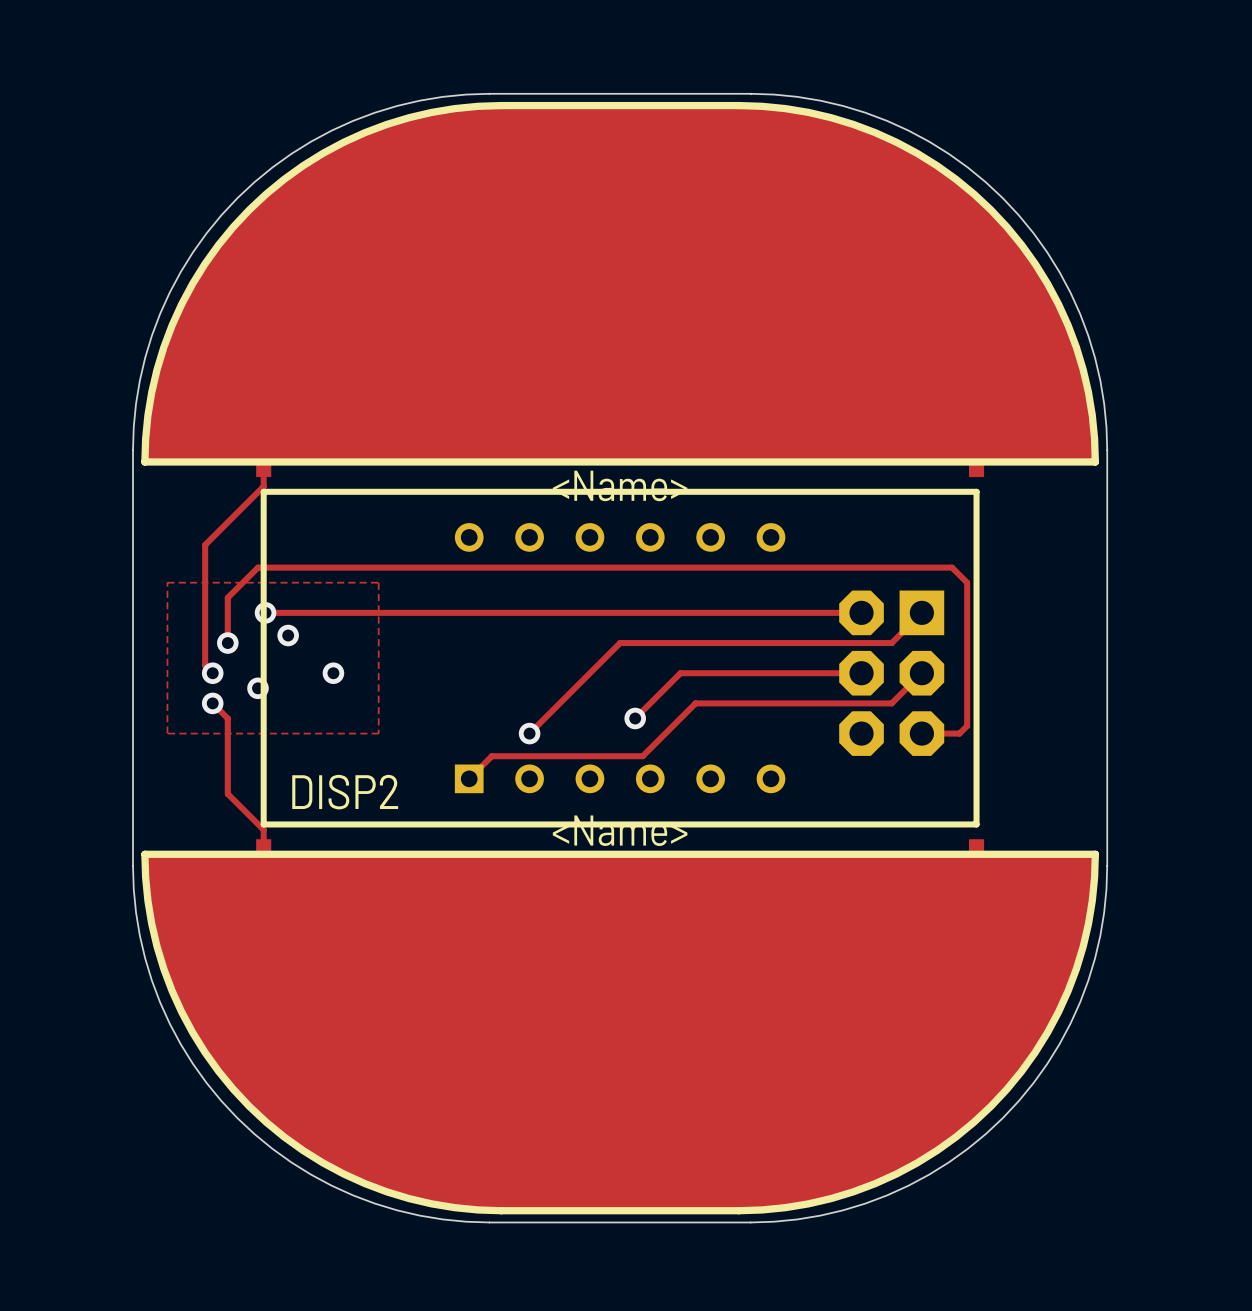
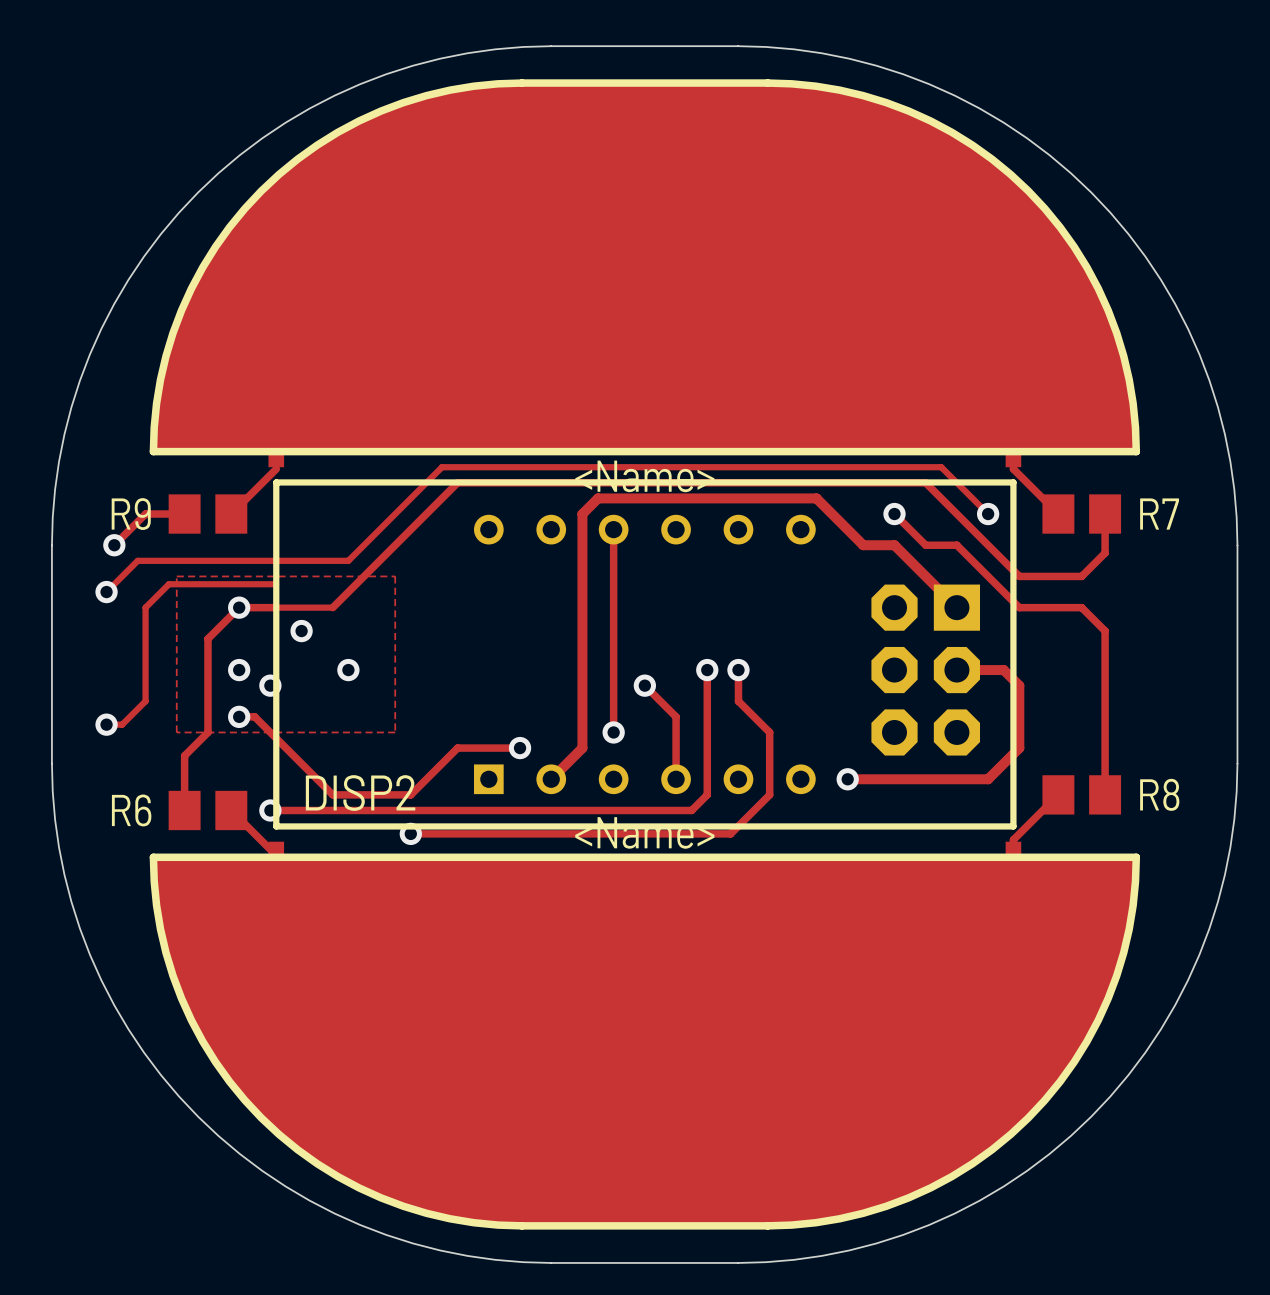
board edge: (489, 93) (774, 94) (820, 100) (865, 112) (887, 120) (929, 141) (948, 153) (985, 182) (1018, 215) (1047, 252) (1059, 272) (1080, 313) (1088, 335) (1100, 380) (1104, 403) (1107, 450) (1107, 866) (1104, 912) (1095, 958) (1080, 1002) (1059, 1044) (1047, 1064) (1018, 1101) (985, 1134) (948, 1162) (908, 1185) (865, 1203) (820, 1215) (797, 1219) (750, 1222) (466, 1221) (419, 1215) (374, 1203) (353, 1195) (311, 1174) (272, 1148) (237, 1118) (206, 1083) (180, 1044) (160, 1002) (151, 980) (139, 935) (133, 889) (133, 450) (136, 403) (139, 380) (151, 335) (160, 313) (180, 272) (193, 252) (221, 215) (254, 182) (291, 153) (331, 130) (374, 112) (419, 100) (442, 96) (489, 93) -> (551, 46) (523, 46) (467, 53) (413, 65) (360, 84) (309, 108) (262, 138) (218, 173) (198, 192) (178, 212) (144, 256) (114, 303) (89, 354) (71, 407) (59, 461) (52, 517) (52, 791) (59, 847) (71, 901) (89, 954) (114, 1005) (144, 1052) (178, 1096) (218, 1135) (262, 1170) (309, 1200) (360, 1224) (386, 1234) (440, 1250) (467, 1255) (523, 1262) (766, 1262) (821, 1255) (876, 1243) (929, 1224) (979, 1200) (1027, 1170) (1070, 1135) (1110, 1096) (1145, 1052) (1175, 1005) (1199, 954) (1209, 928) (1224, 874) (1230, 847) (1236, 791) (1236, 517) (1230, 461) (1217, 407) (1209, 380) (1188, 328) (1160, 279) (1128, 234) (1110, 212) (1070, 173) (1027, 138) (979, 108) (954, 95) (903, 74) (876, 65) (821, 53) (766, 46) (738, 46) (551, 46)
track: none -> (1013, 451) (1013, 469) (1058, 514)
track: (263, 478) (263, 486) (205, 544) (205, 665) (212, 673) -> (276, 469) (231, 514)
track: none -> (184, 514) (145, 514) (114, 545)
R9: none -> (207, 514)
track: none -> (894, 514) (925, 545) (956, 545) (1019, 607) (1081, 607) (1105, 630) (1105, 794)
via: none -> (894, 514)
via: none -> (988, 514)
R7: none -> (1081, 514)
track: none -> (613, 529) (613, 732)
via: none -> (114, 545)
track: (257, 567) (227, 597) (227, 643) -> (270, 560) (137, 560) (106, 592)
track: (333, 567) (952, 567) (967, 582) (967, 726) (959, 733) (921, 733) -> (348, 560) (442, 467) (941, 467) (988, 514)
track: none -> (276, 584) (168, 584) (145, 607) (145, 701) (122, 724) (106, 724)
via: none -> (106, 592)
via: none -> (239, 607)
track: none -> (276, 607) (239, 607) (207, 638) (207, 732) (184, 755) (184, 810)
via: (265, 612) -> none
track: (318, 612) (861, 612) -> (332, 607) (457, 482) (925, 482) (1019, 576) (1081, 576) (1105, 553) (1105, 514)
track: (921, 612) (891, 643) (620, 643) (529, 733) -> (956, 607) (894, 545) (863, 545) (816, 498) (598, 498) (582, 514) (582, 748) (551, 779)
via: (227, 643) -> none
via position: (212, 673) -> (239, 670)
track: none -> (707, 670) (707, 794) (691, 810) (270, 810)
via: none -> (707, 670)
track: none -> (738, 670) (738, 701) (769, 732) (769, 794) (730, 833) (410, 833)
via: none -> (738, 670)
track: (861, 673) (680, 673) (635, 718) -> none
track: (921, 673) (891, 703) (695, 703) (642, 756) (491, 756) (469, 778) -> (956, 670) (1003, 670) (1019, 685) (1019, 748) (988, 779) (847, 779)
track: none -> (644, 685) (676, 716) (676, 779)
via: none -> (644, 685)
track: (212, 703) (227, 718) (227, 793) (263, 829) (263, 852) -> (231, 810) (276, 855)
via position: (212, 703) -> (239, 716)
track: none -> (239, 716) (254, 716) (332, 794) (410, 794) (457, 748) (520, 748)
via: (635, 718) -> none
via: none -> (106, 724)
via: (529, 733) -> none
via: none -> (613, 732)
via: none -> (520, 748)
via: none -> (847, 779)
track: none -> (1058, 794) (1013, 839) (1013, 857)
R8: none -> (1081, 794)
R6: none -> (207, 810)
via: none -> (270, 810)
via: none -> (410, 833)

